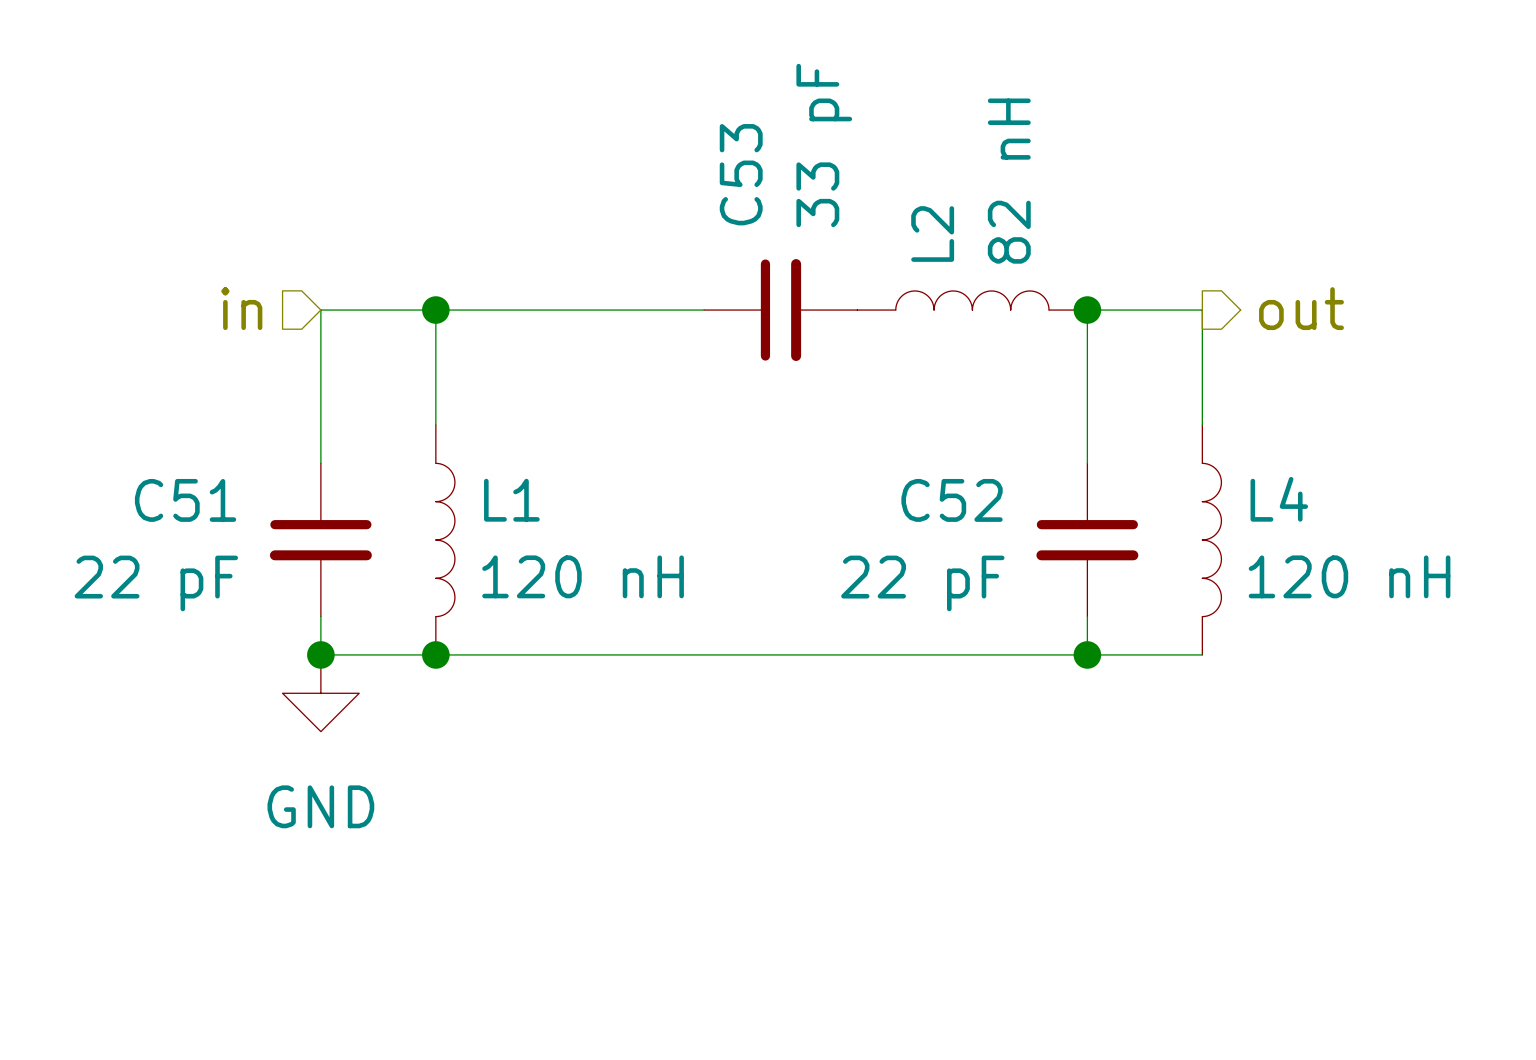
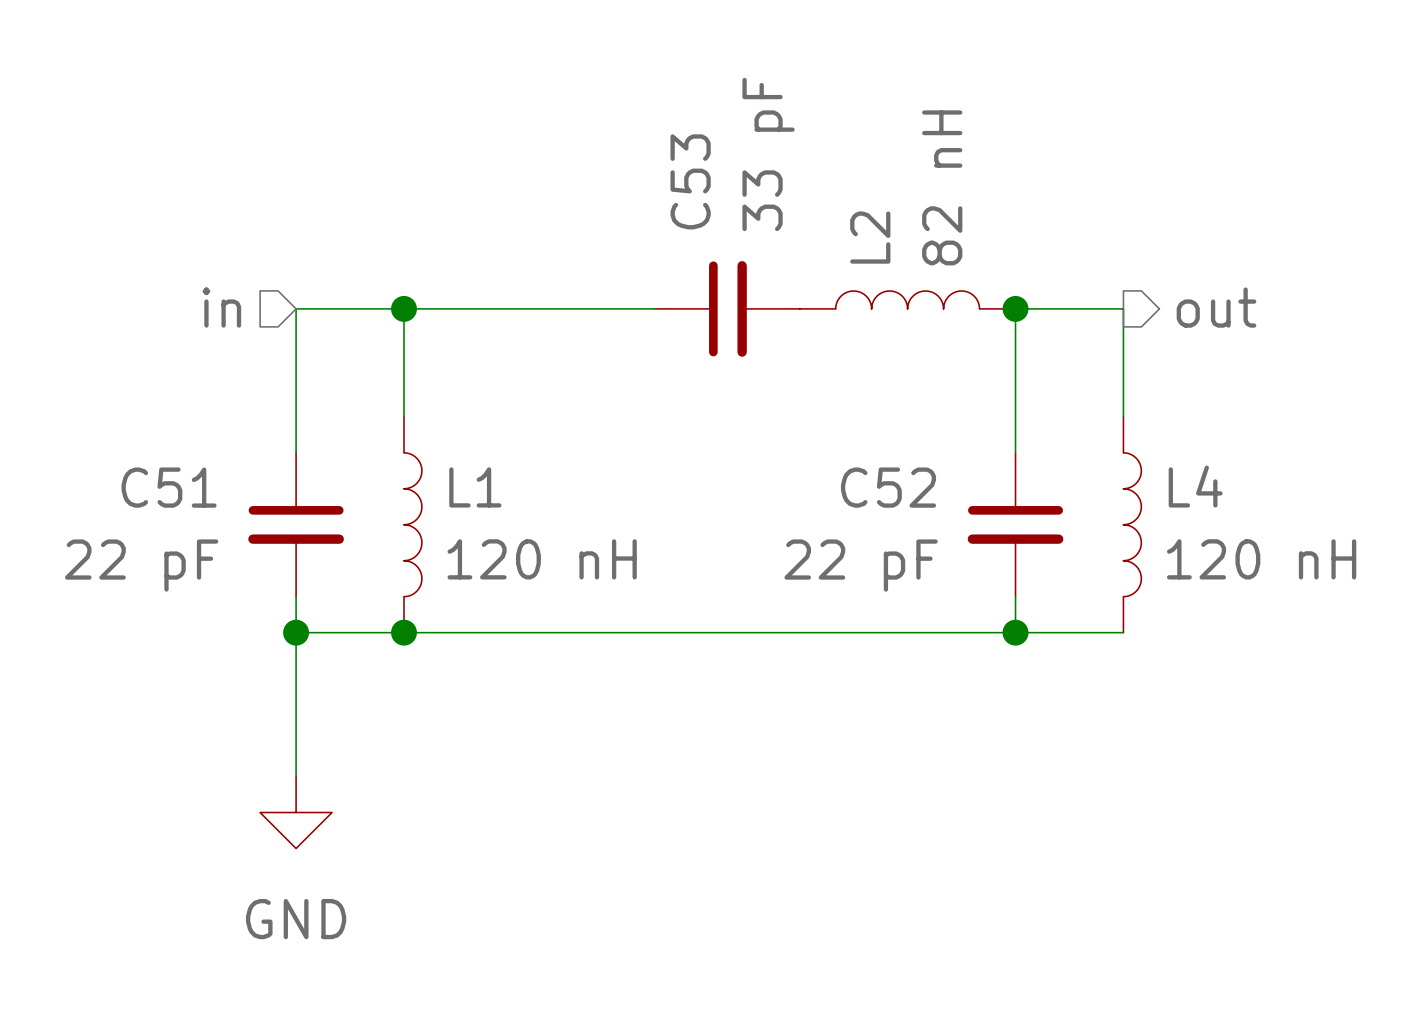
wire: none -> (296, 632) (296, 776)
power symbol position: GND (320, 693) -> GND (296, 812)

